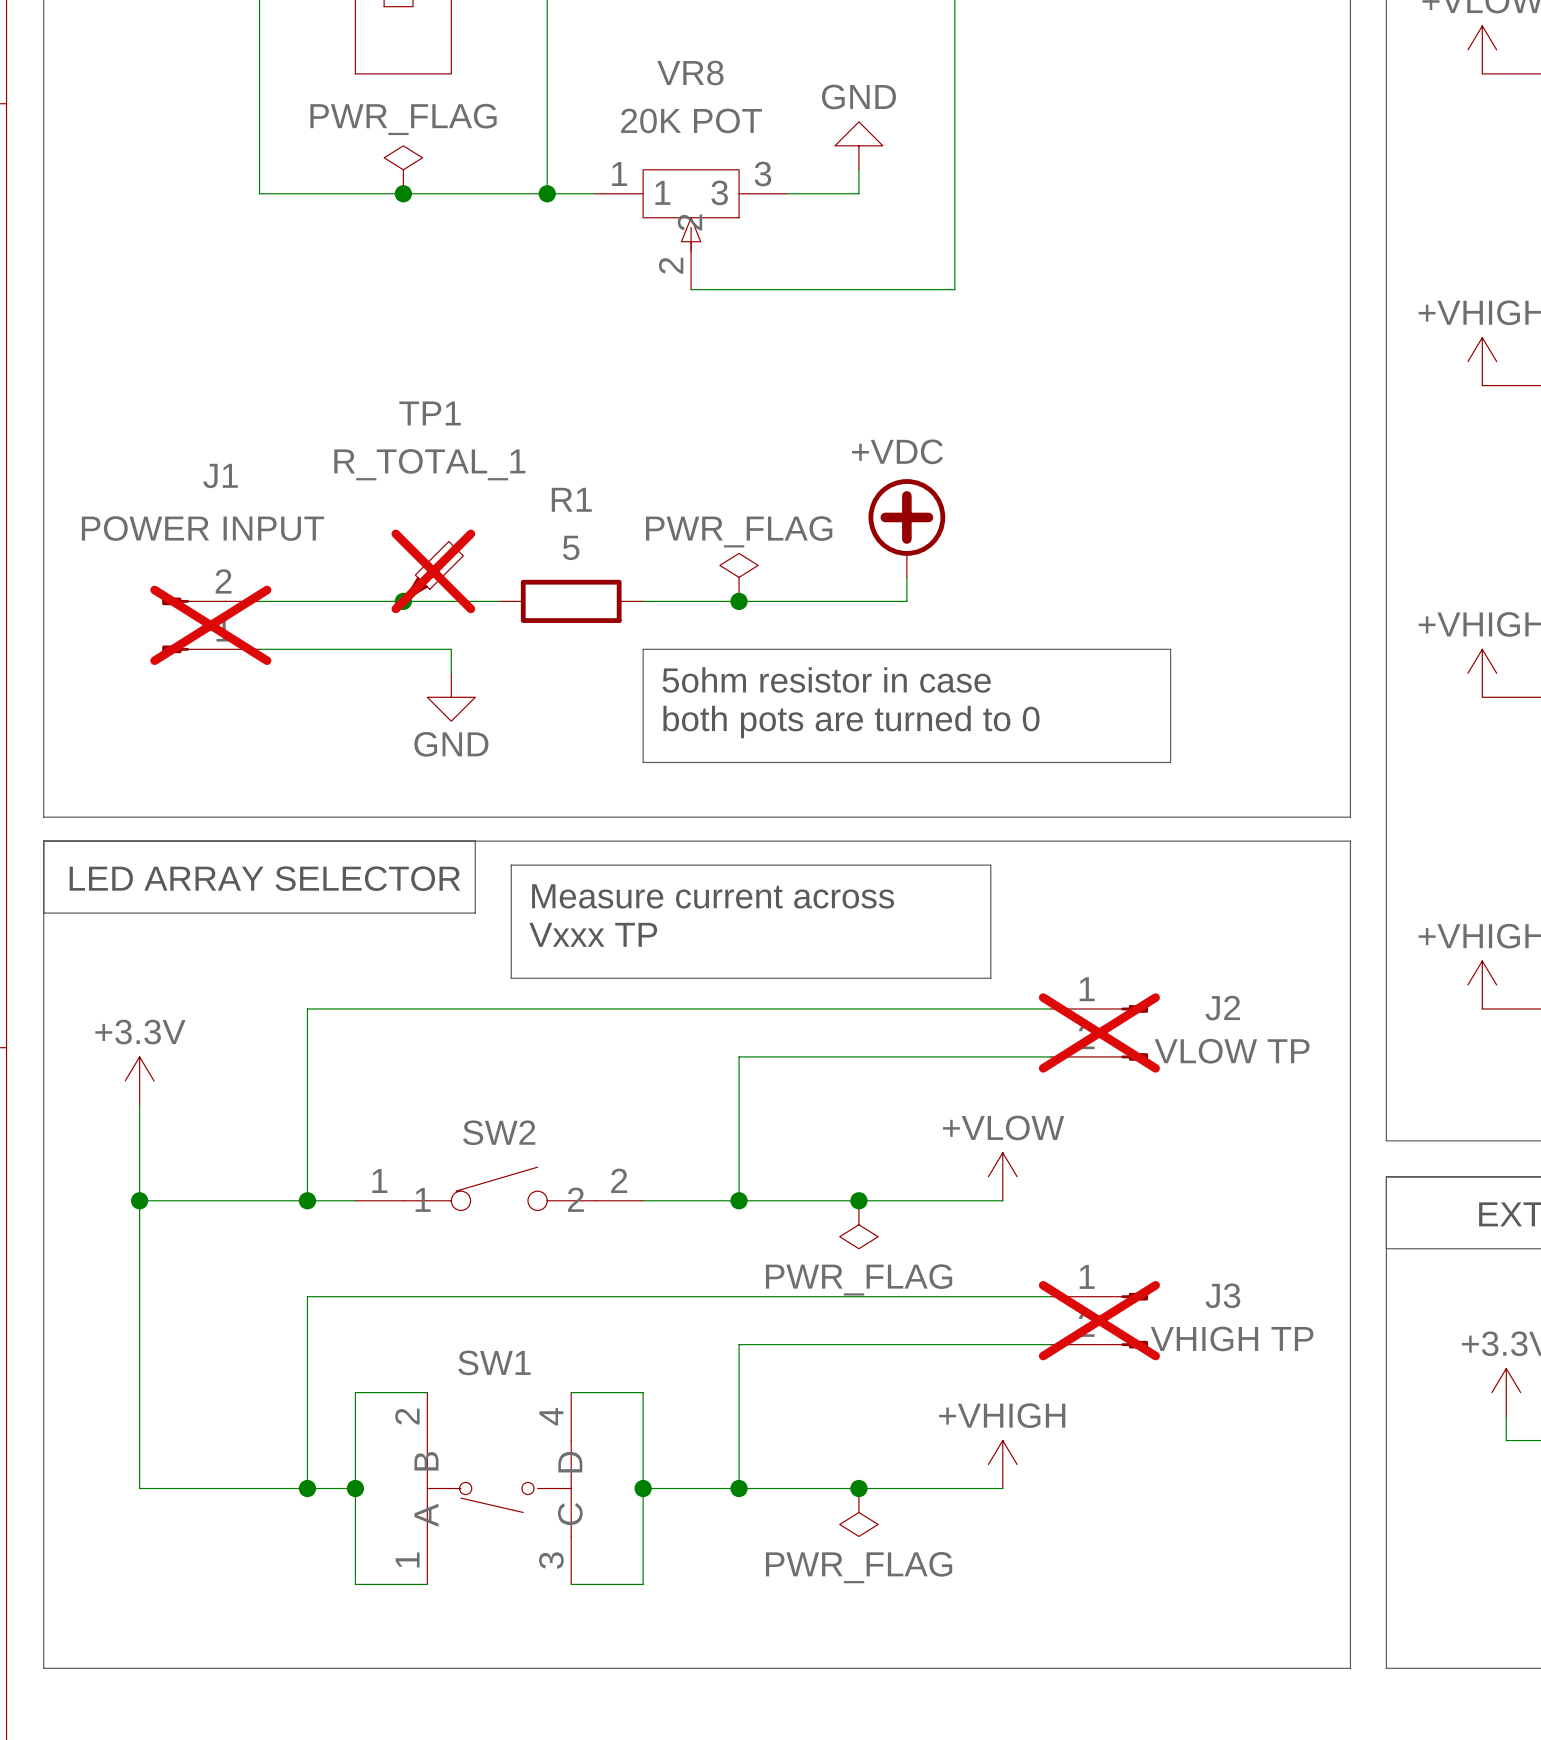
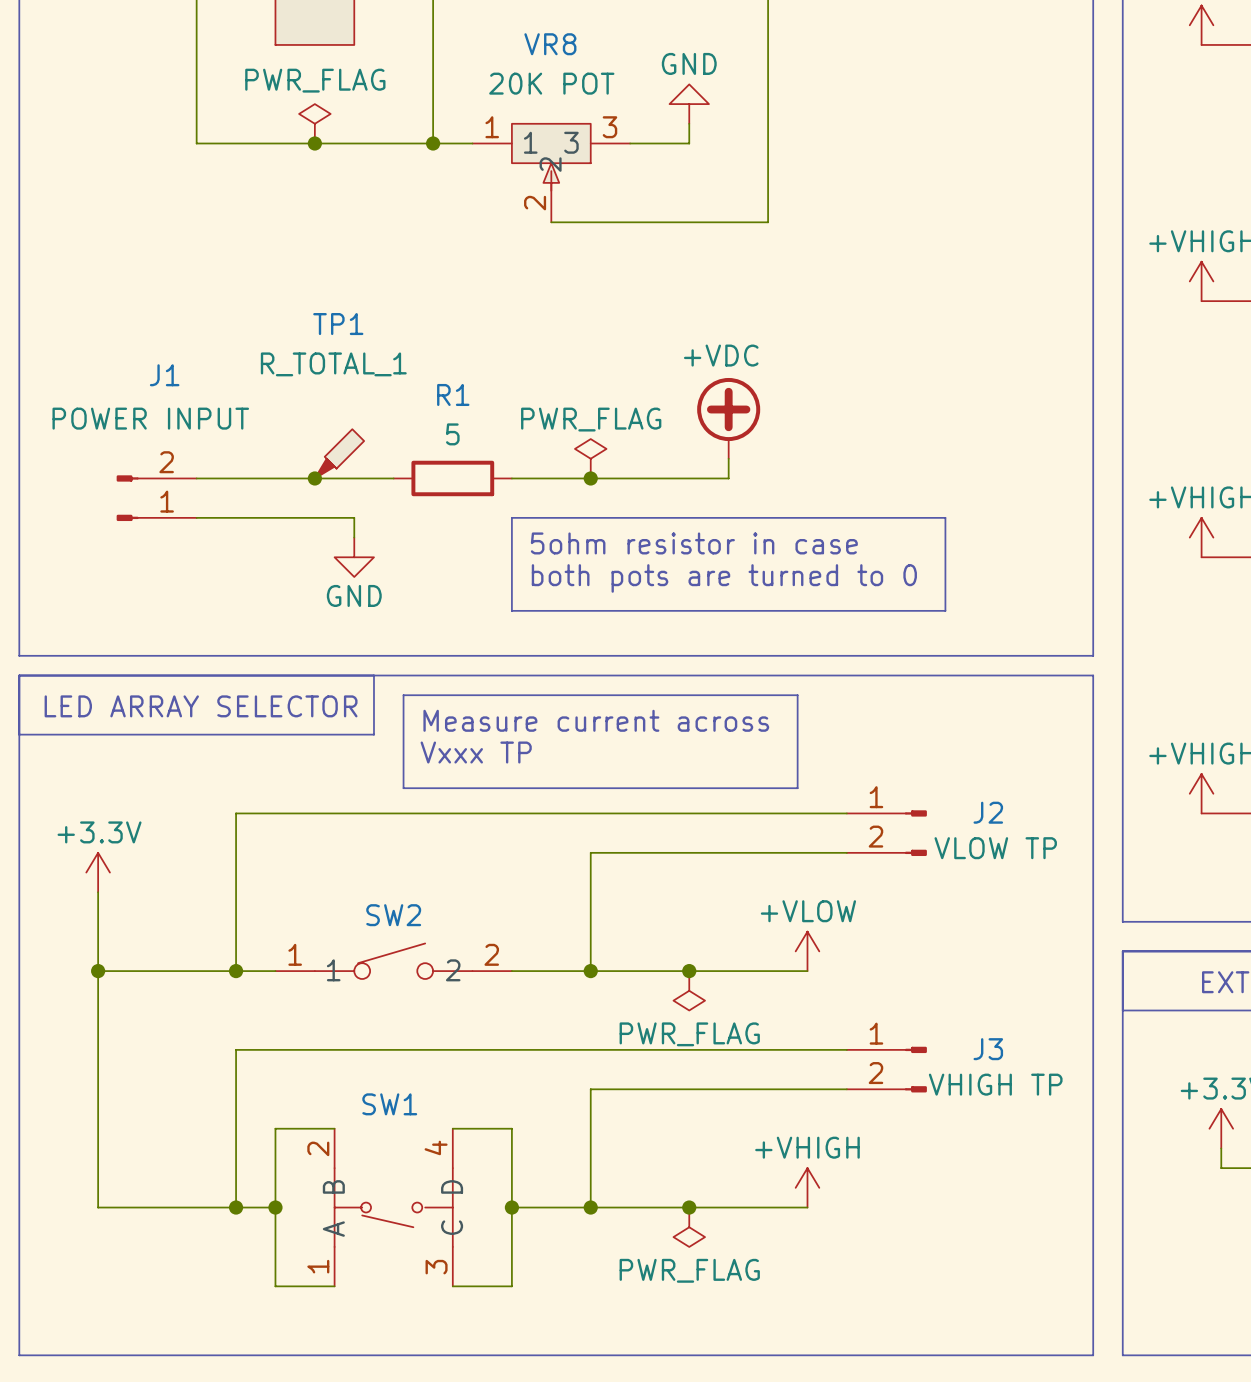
TP1 do-not-place cross: (433, 571) -> none
J1 do-not-place cross: (210, 625) -> none
J2 do-not-place cross: (1099, 1032) -> none
J3 do-not-place cross: (1099, 1320) -> none

